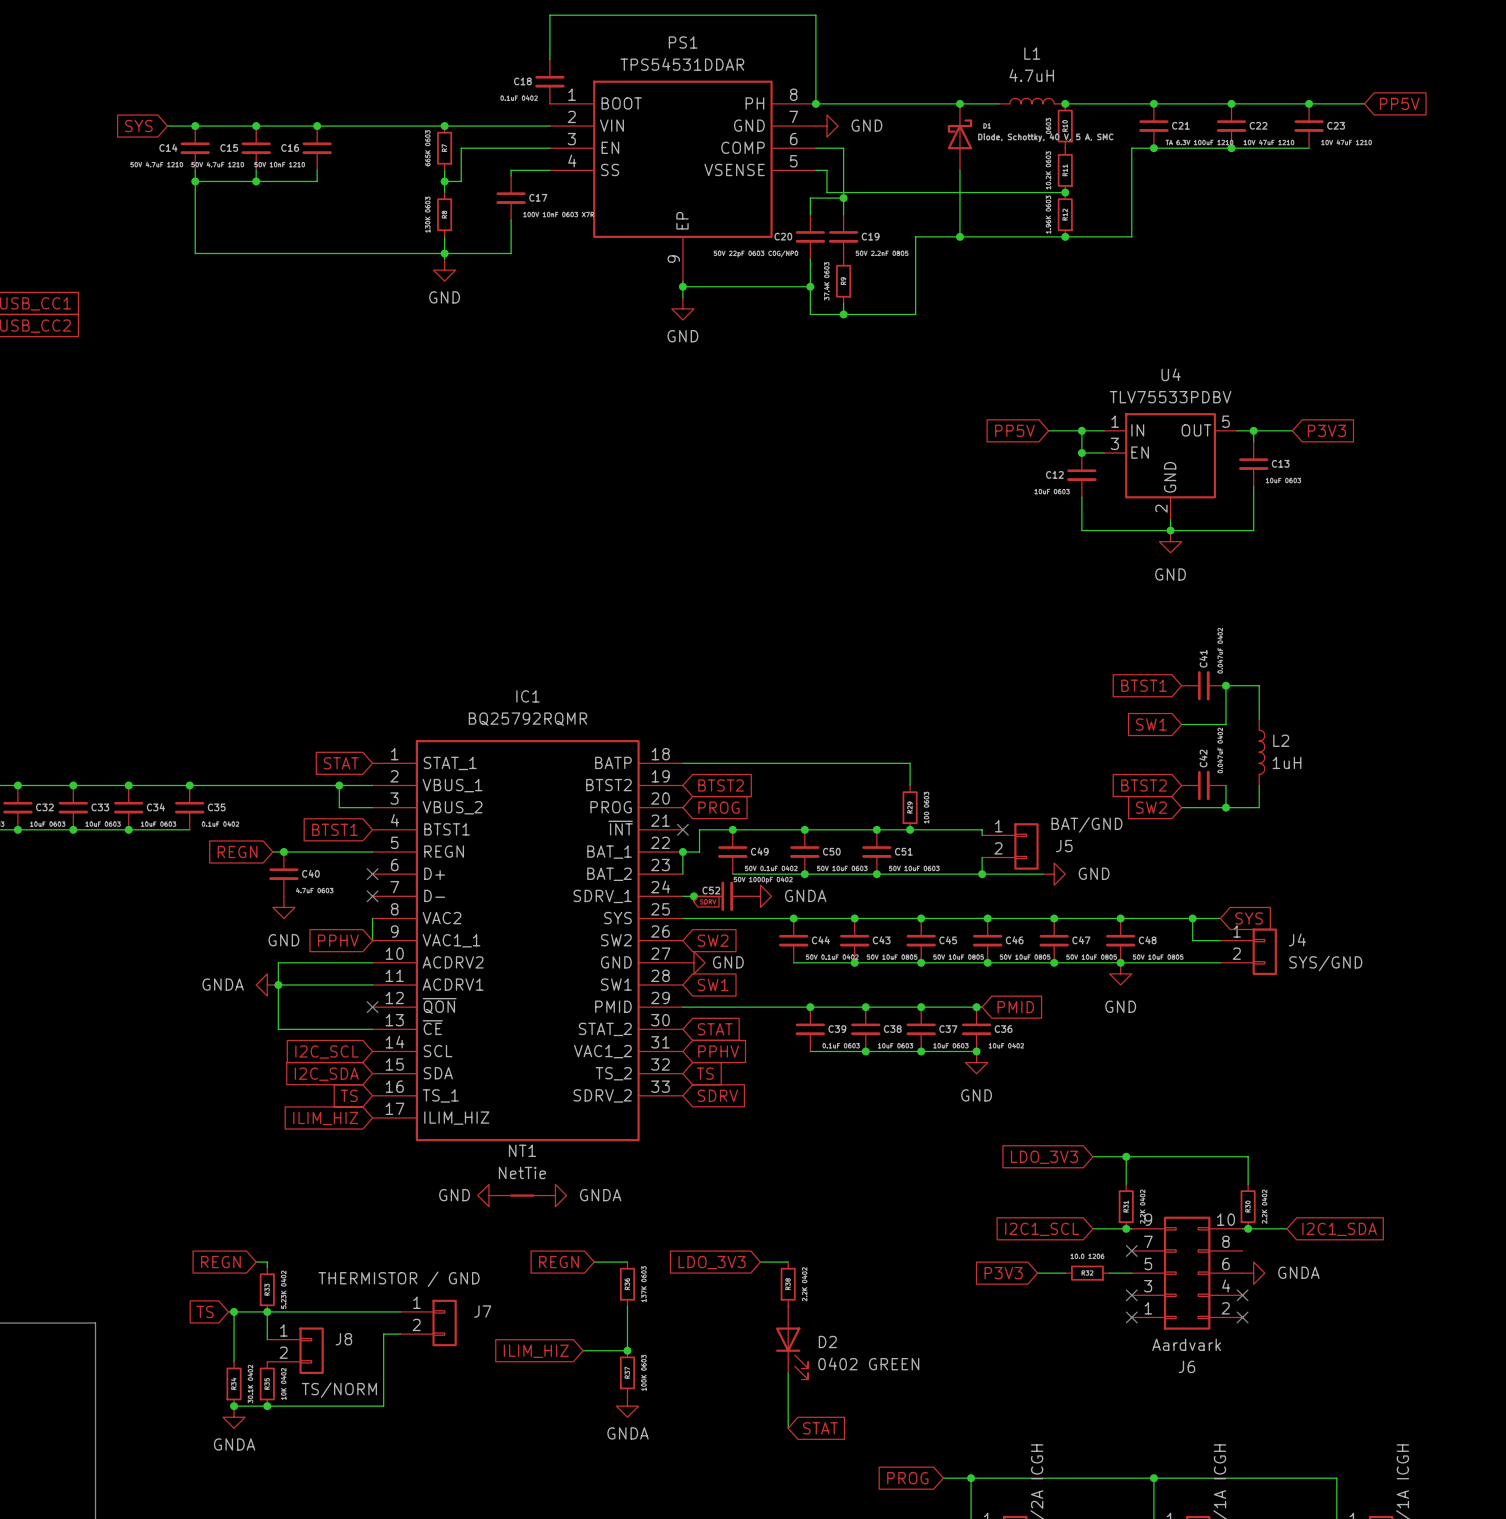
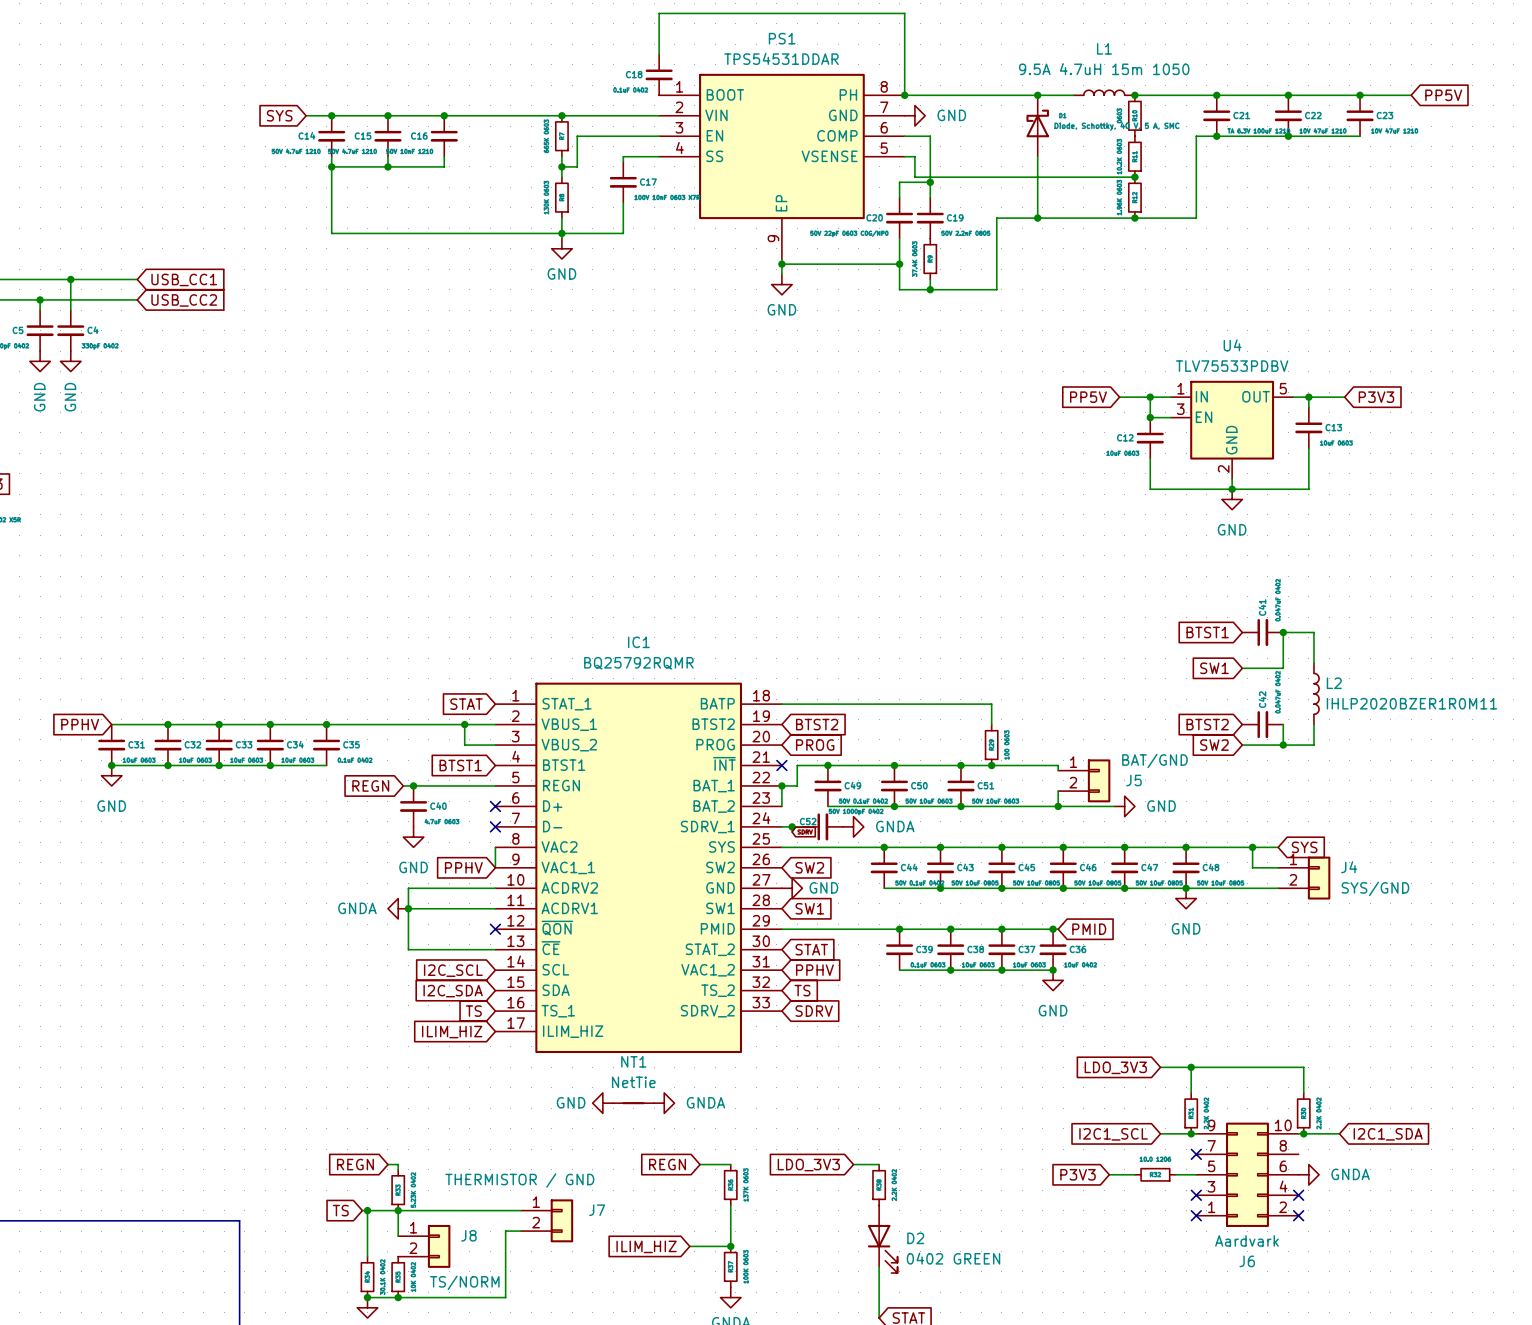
L1 value: 4.7uH (1031, 75) -> 9.5A 4.7uH 15m 1050 (1104, 69)
L2 value: 1uH (1287, 762) -> IHLP2020BZER1R0M11 (1411, 703)

